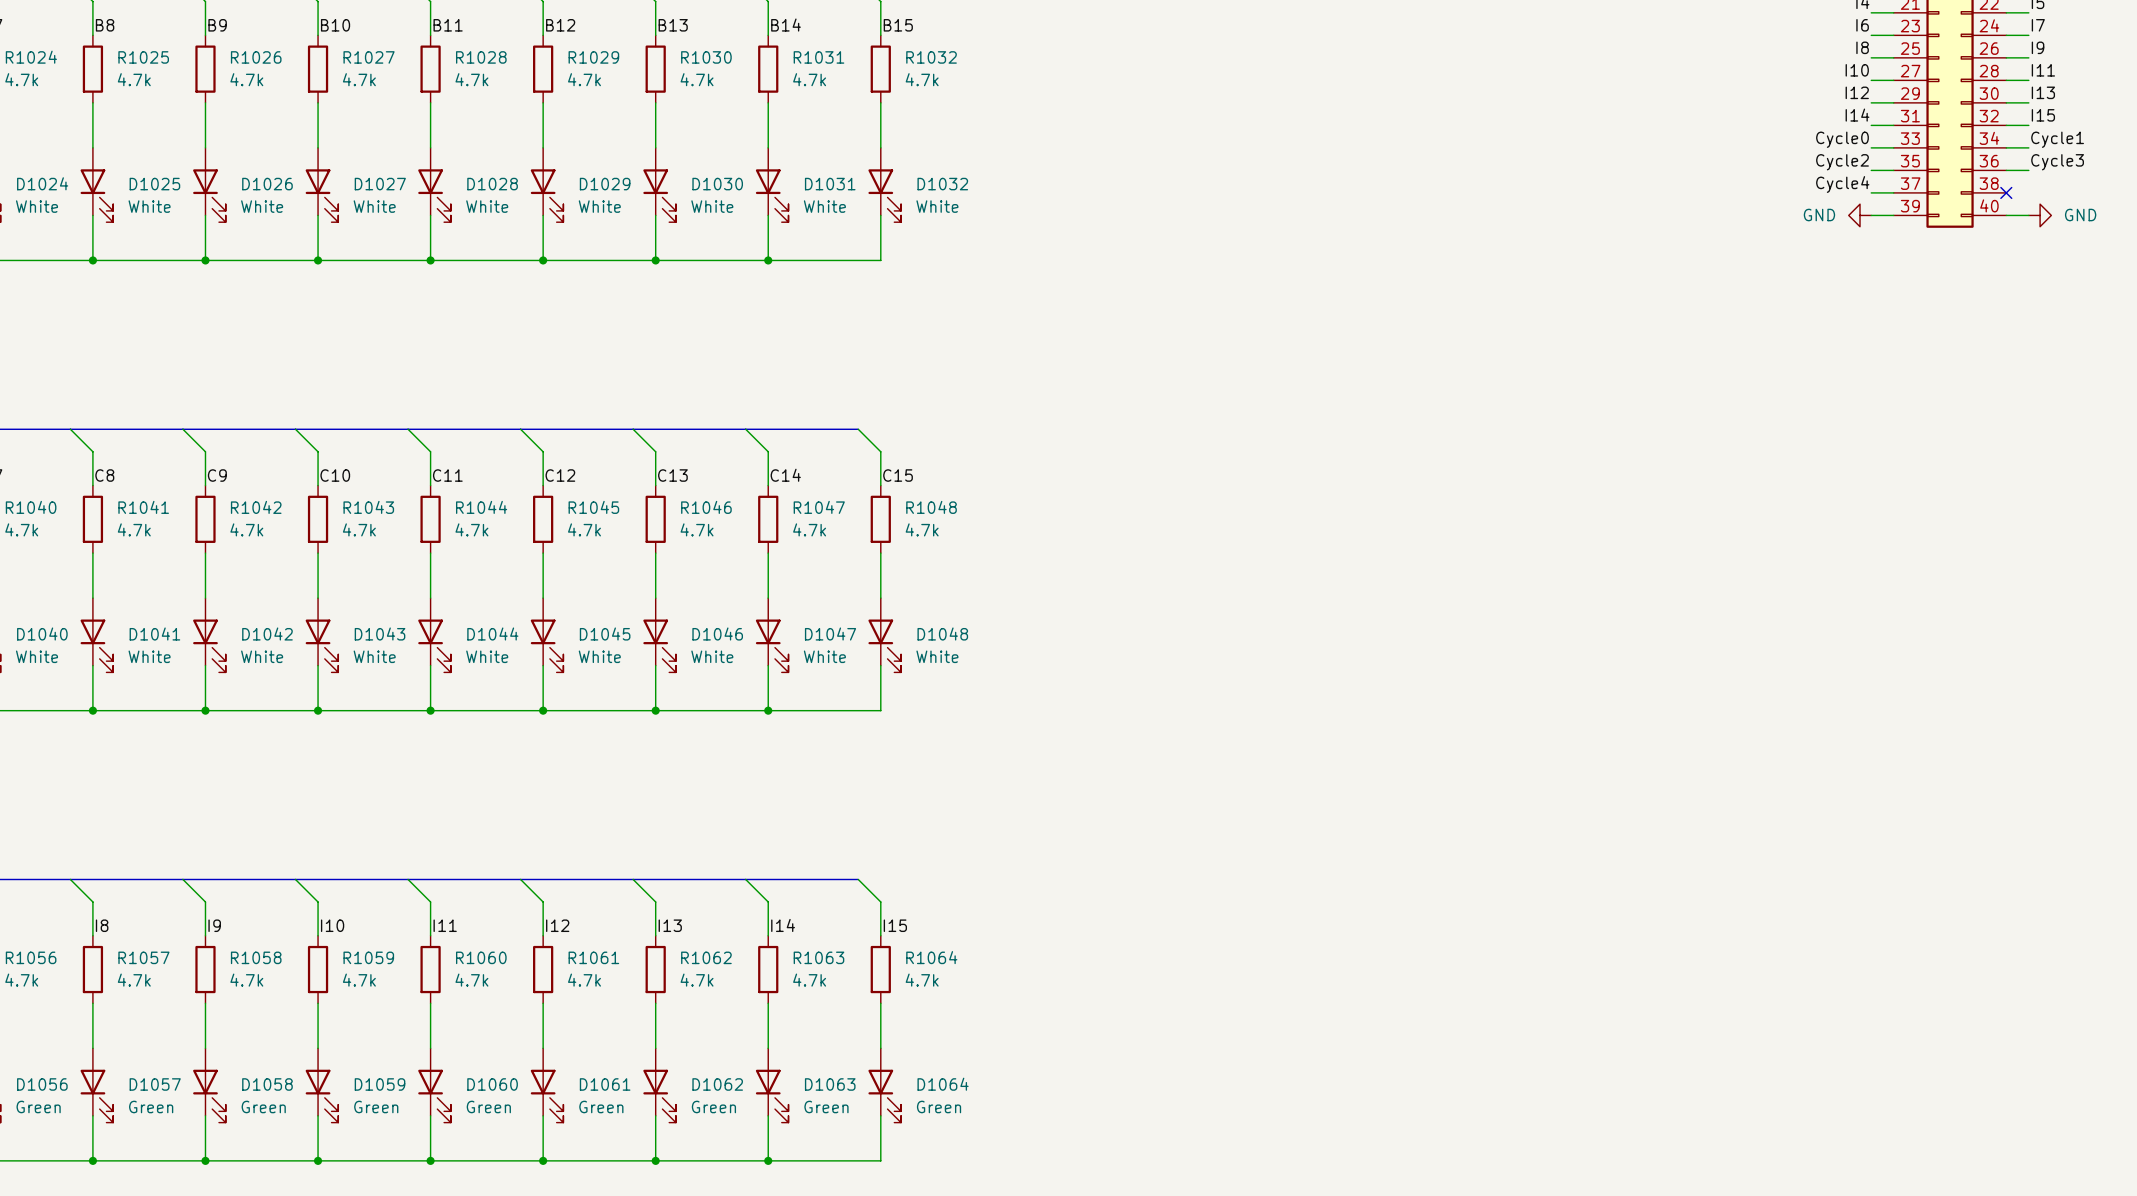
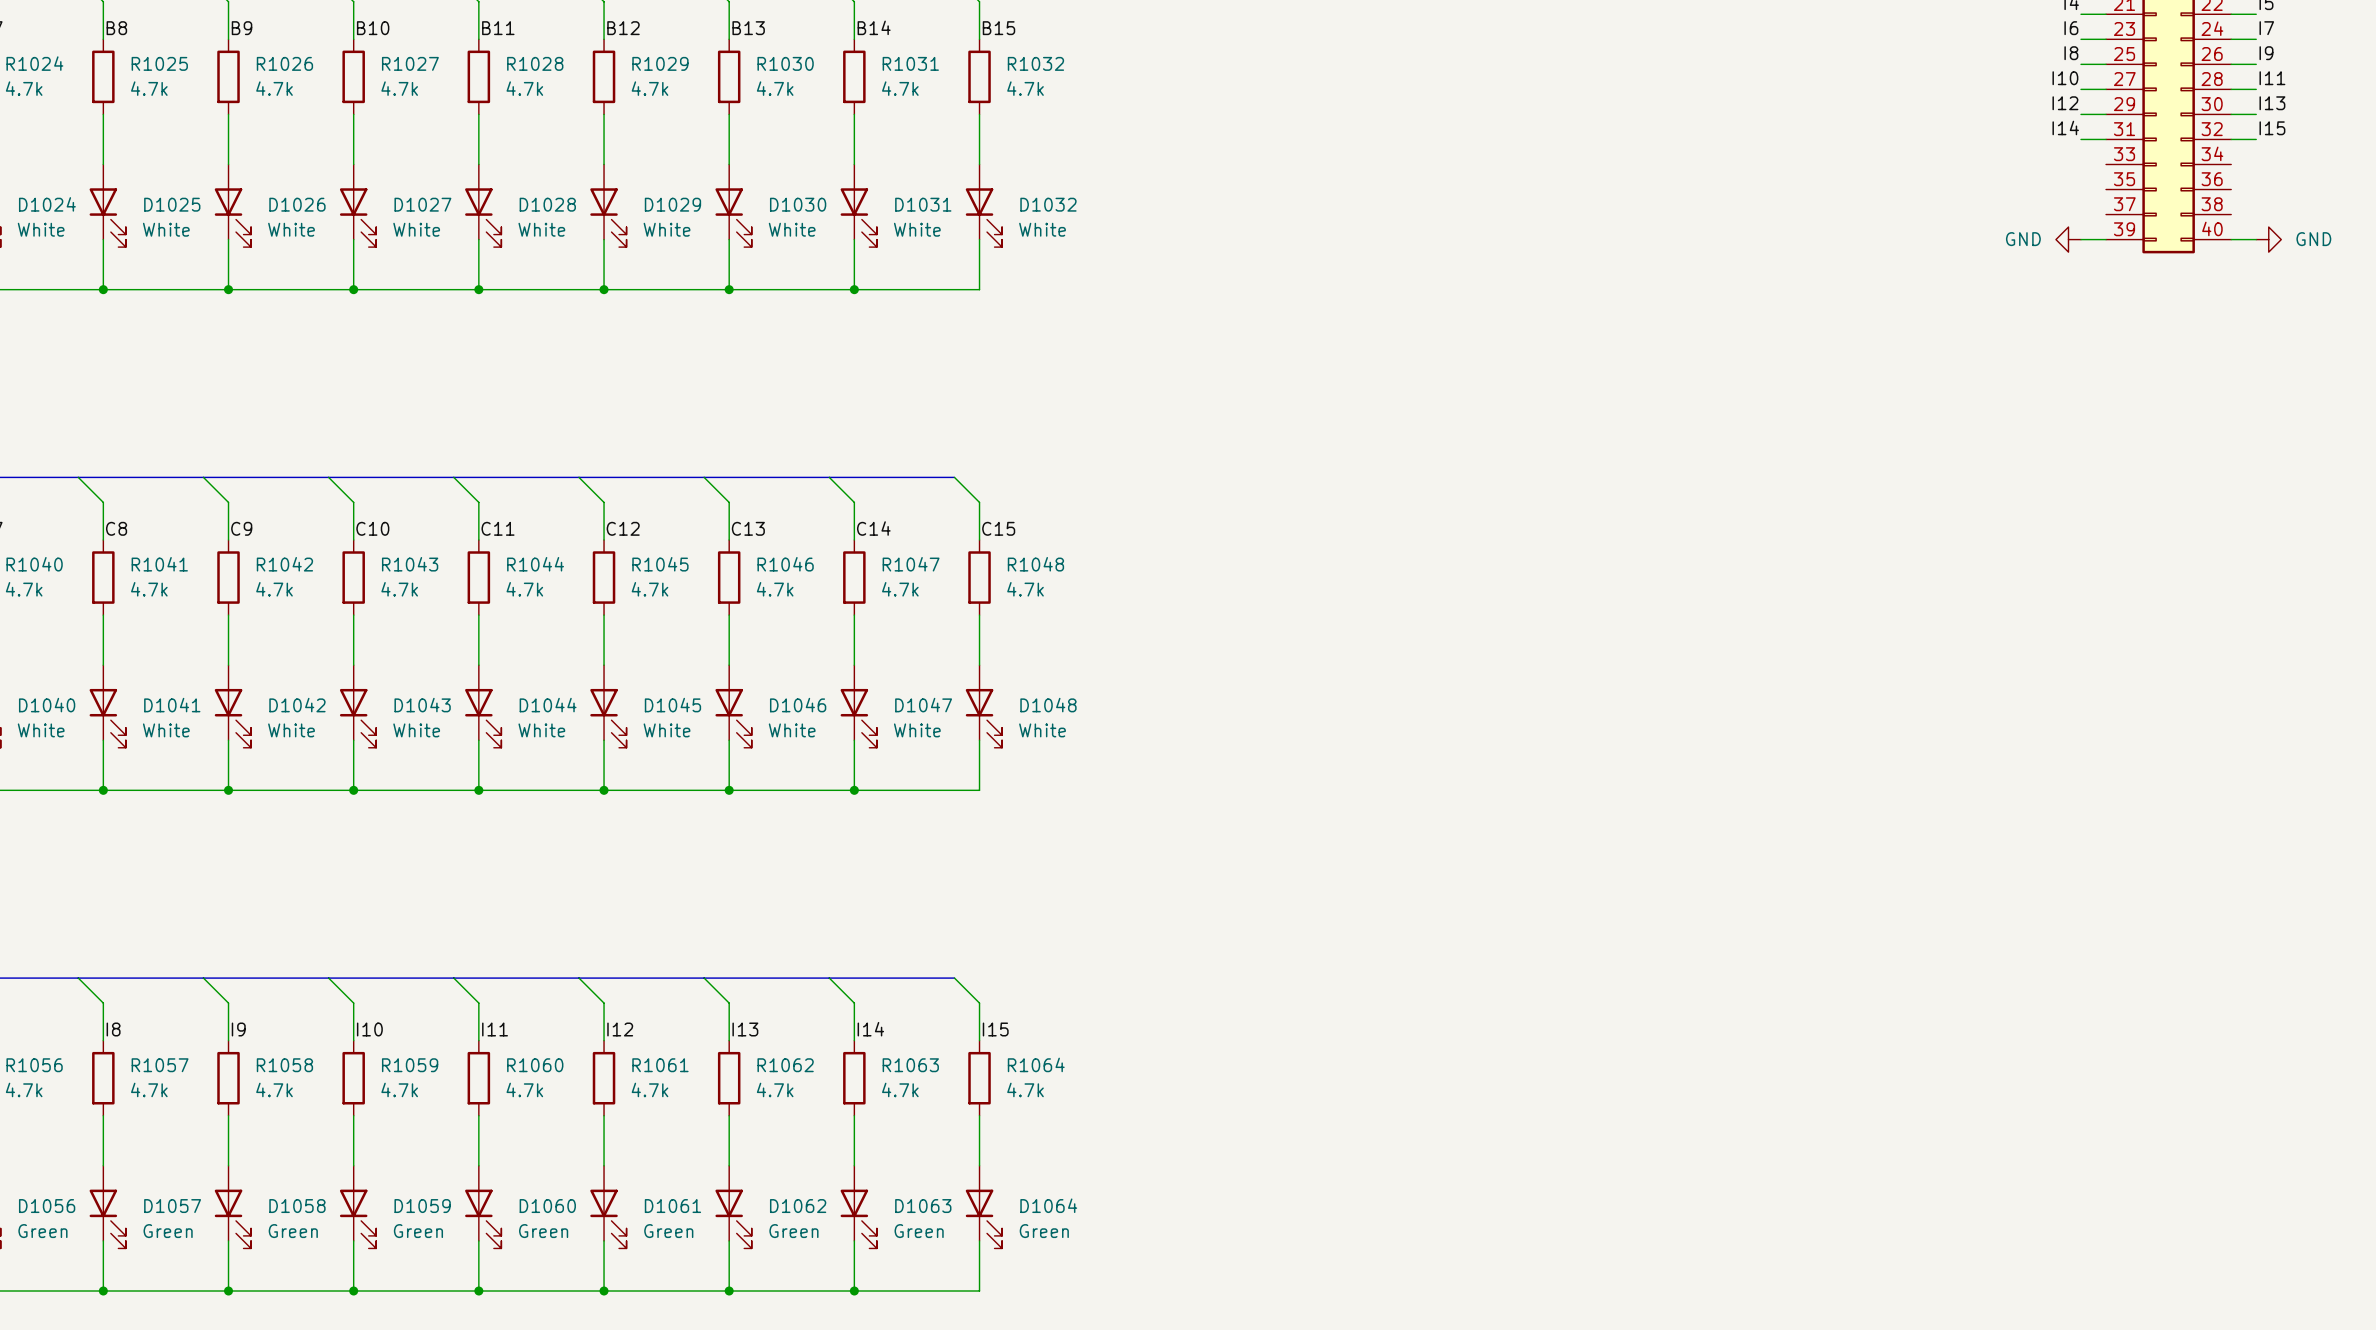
label: Cycle0 (1842, 139) -> none
label: Cycle1 (2057, 139) -> none
wire: (1871, 147) (1893, 147) -> none
wire: (2006, 147) (2028, 147) -> none
label: Cycle2 (1842, 162) -> none
label: Cycle3 (2057, 162) -> none
wire: (1871, 170) (1893, 170) -> none
wire: (2006, 170) (2028, 170) -> none
label: Cycle4 (1842, 184) -> none
wire: (1871, 192) (1893, 192) -> none
no-connect mark: (2006, 192) -> none

